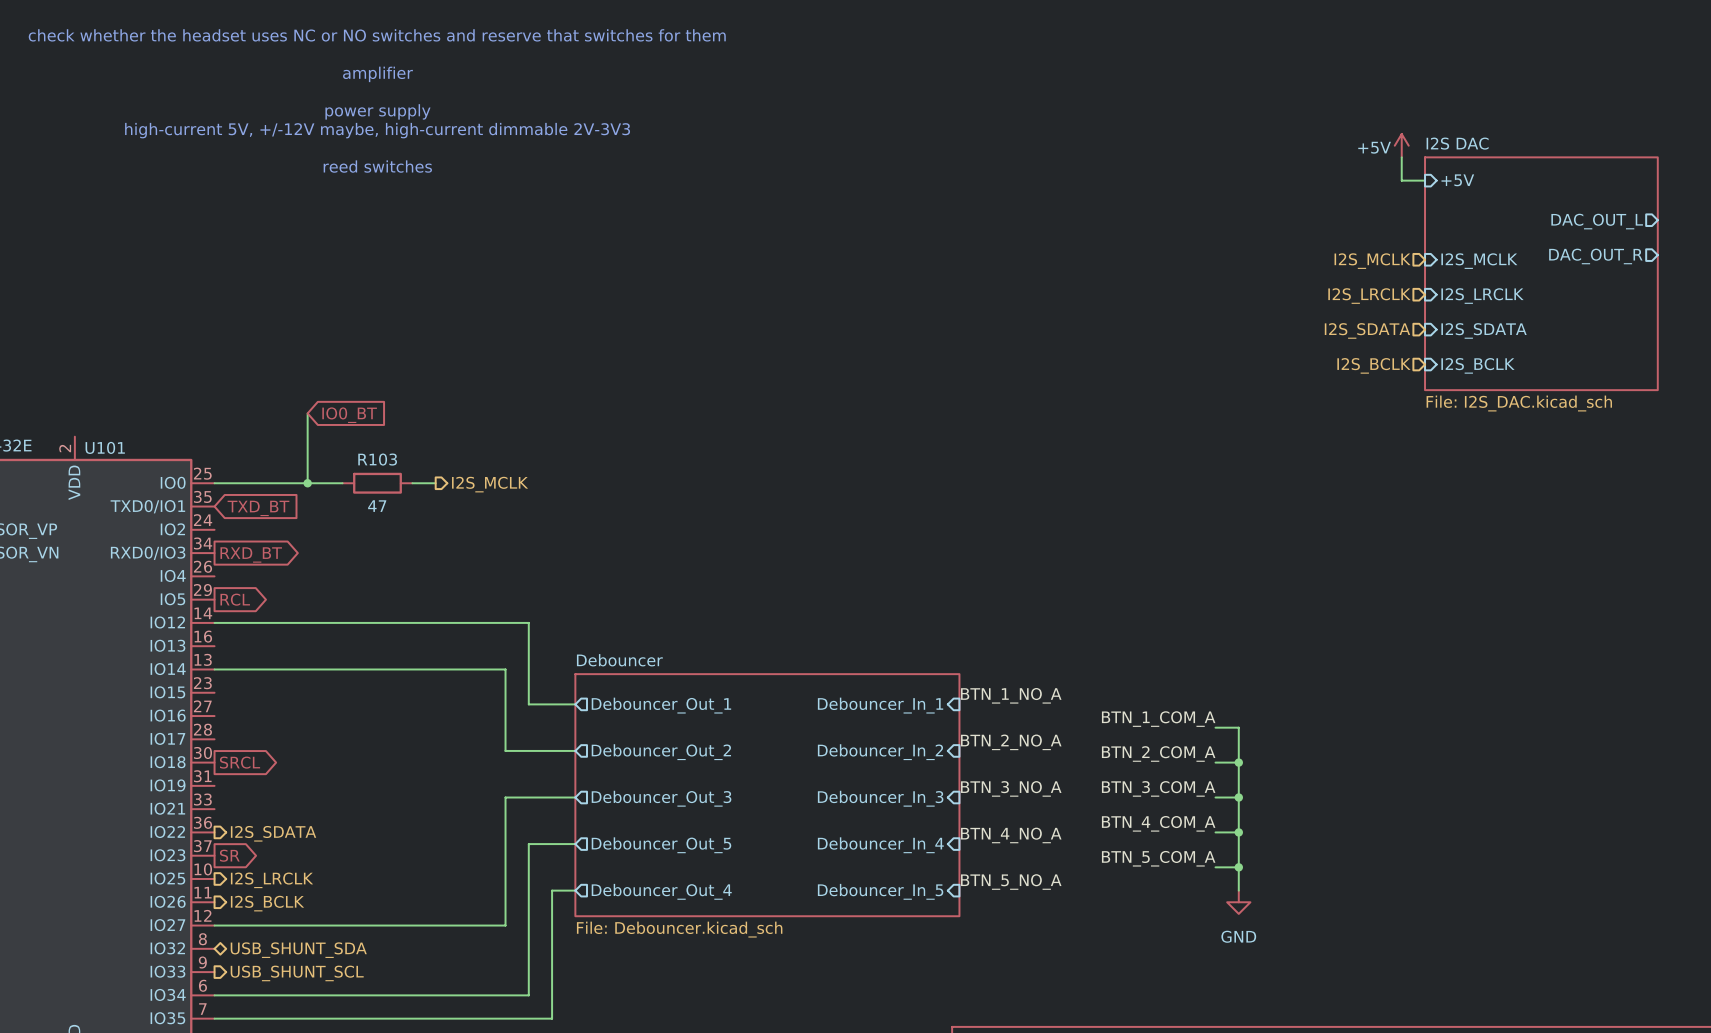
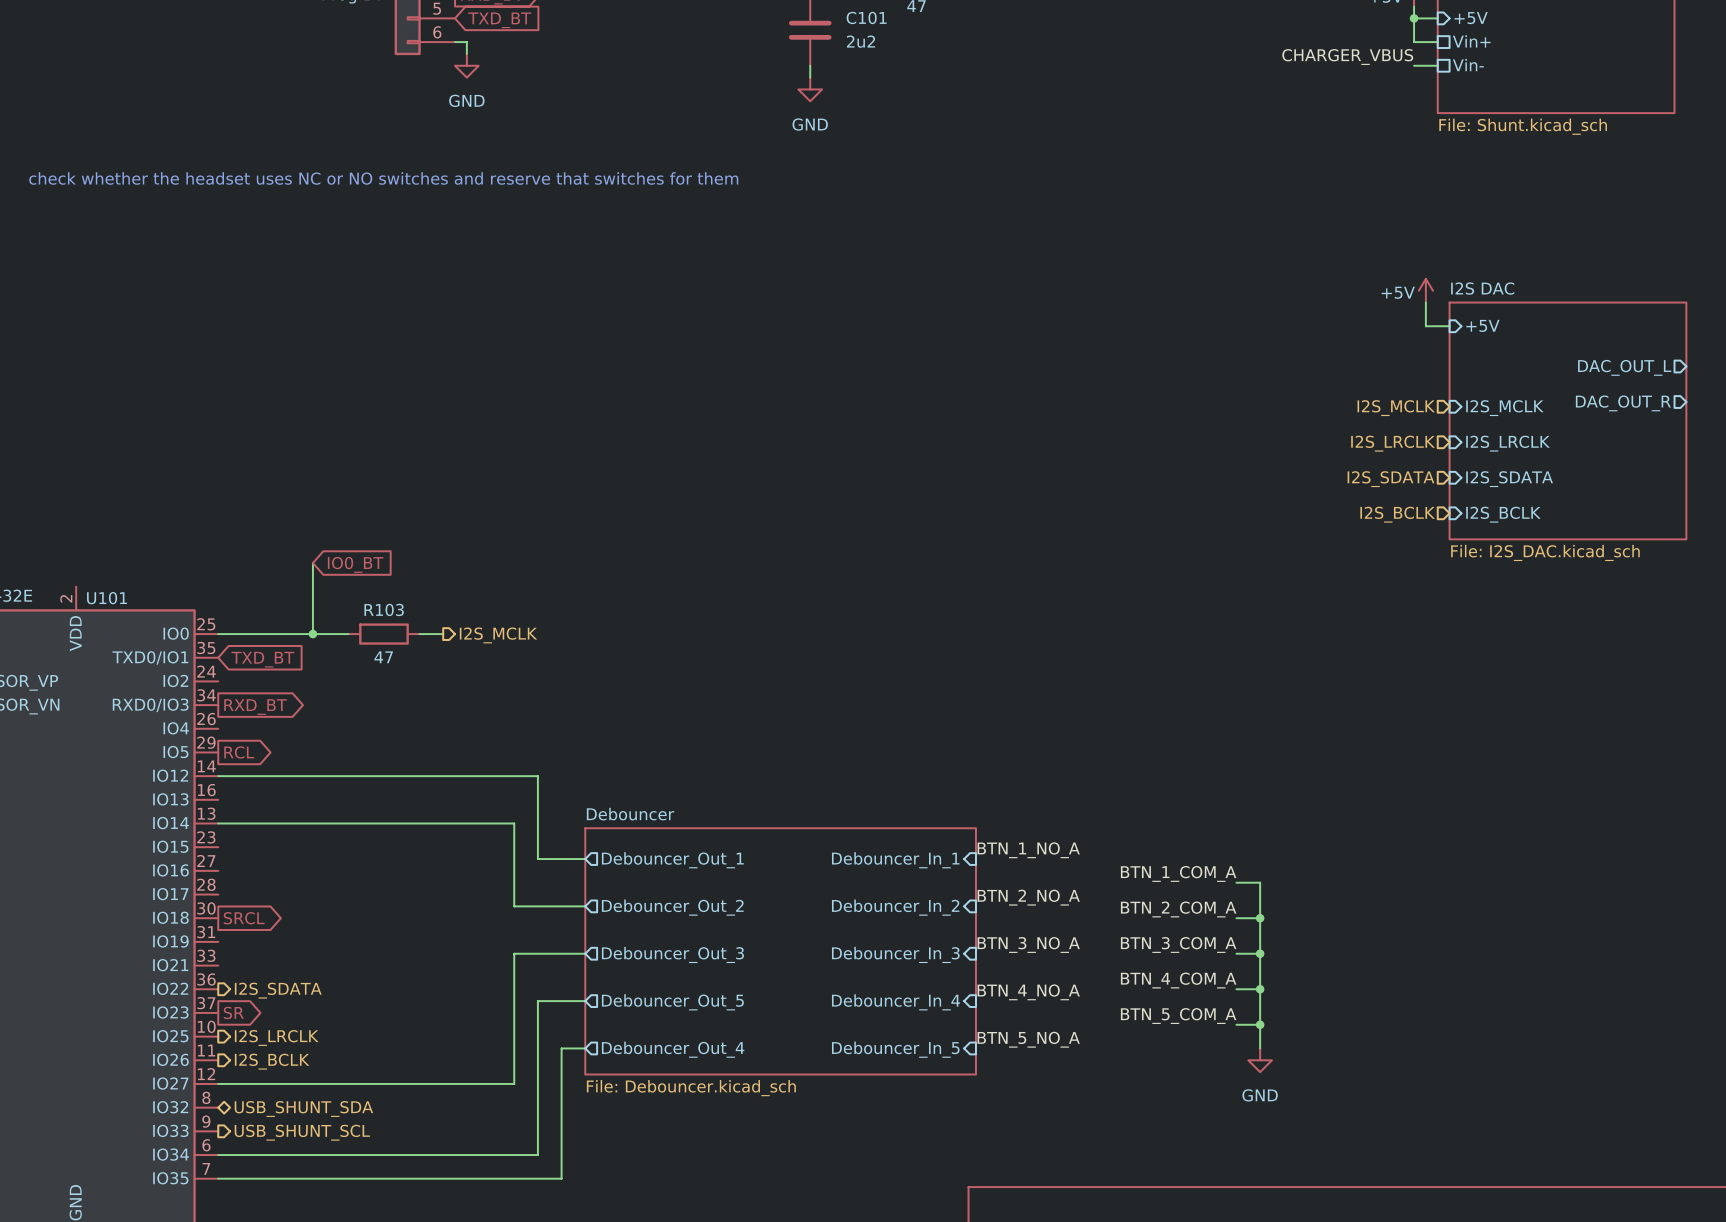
text: amplifier (377, 74) -> none
text: power supply (377, 111) -> none
text: high-current 5V, +/-12V maybe, high-current dimmable 2V-3V3 (377, 130) -> none
text: reed switches (377, 166) -> none

